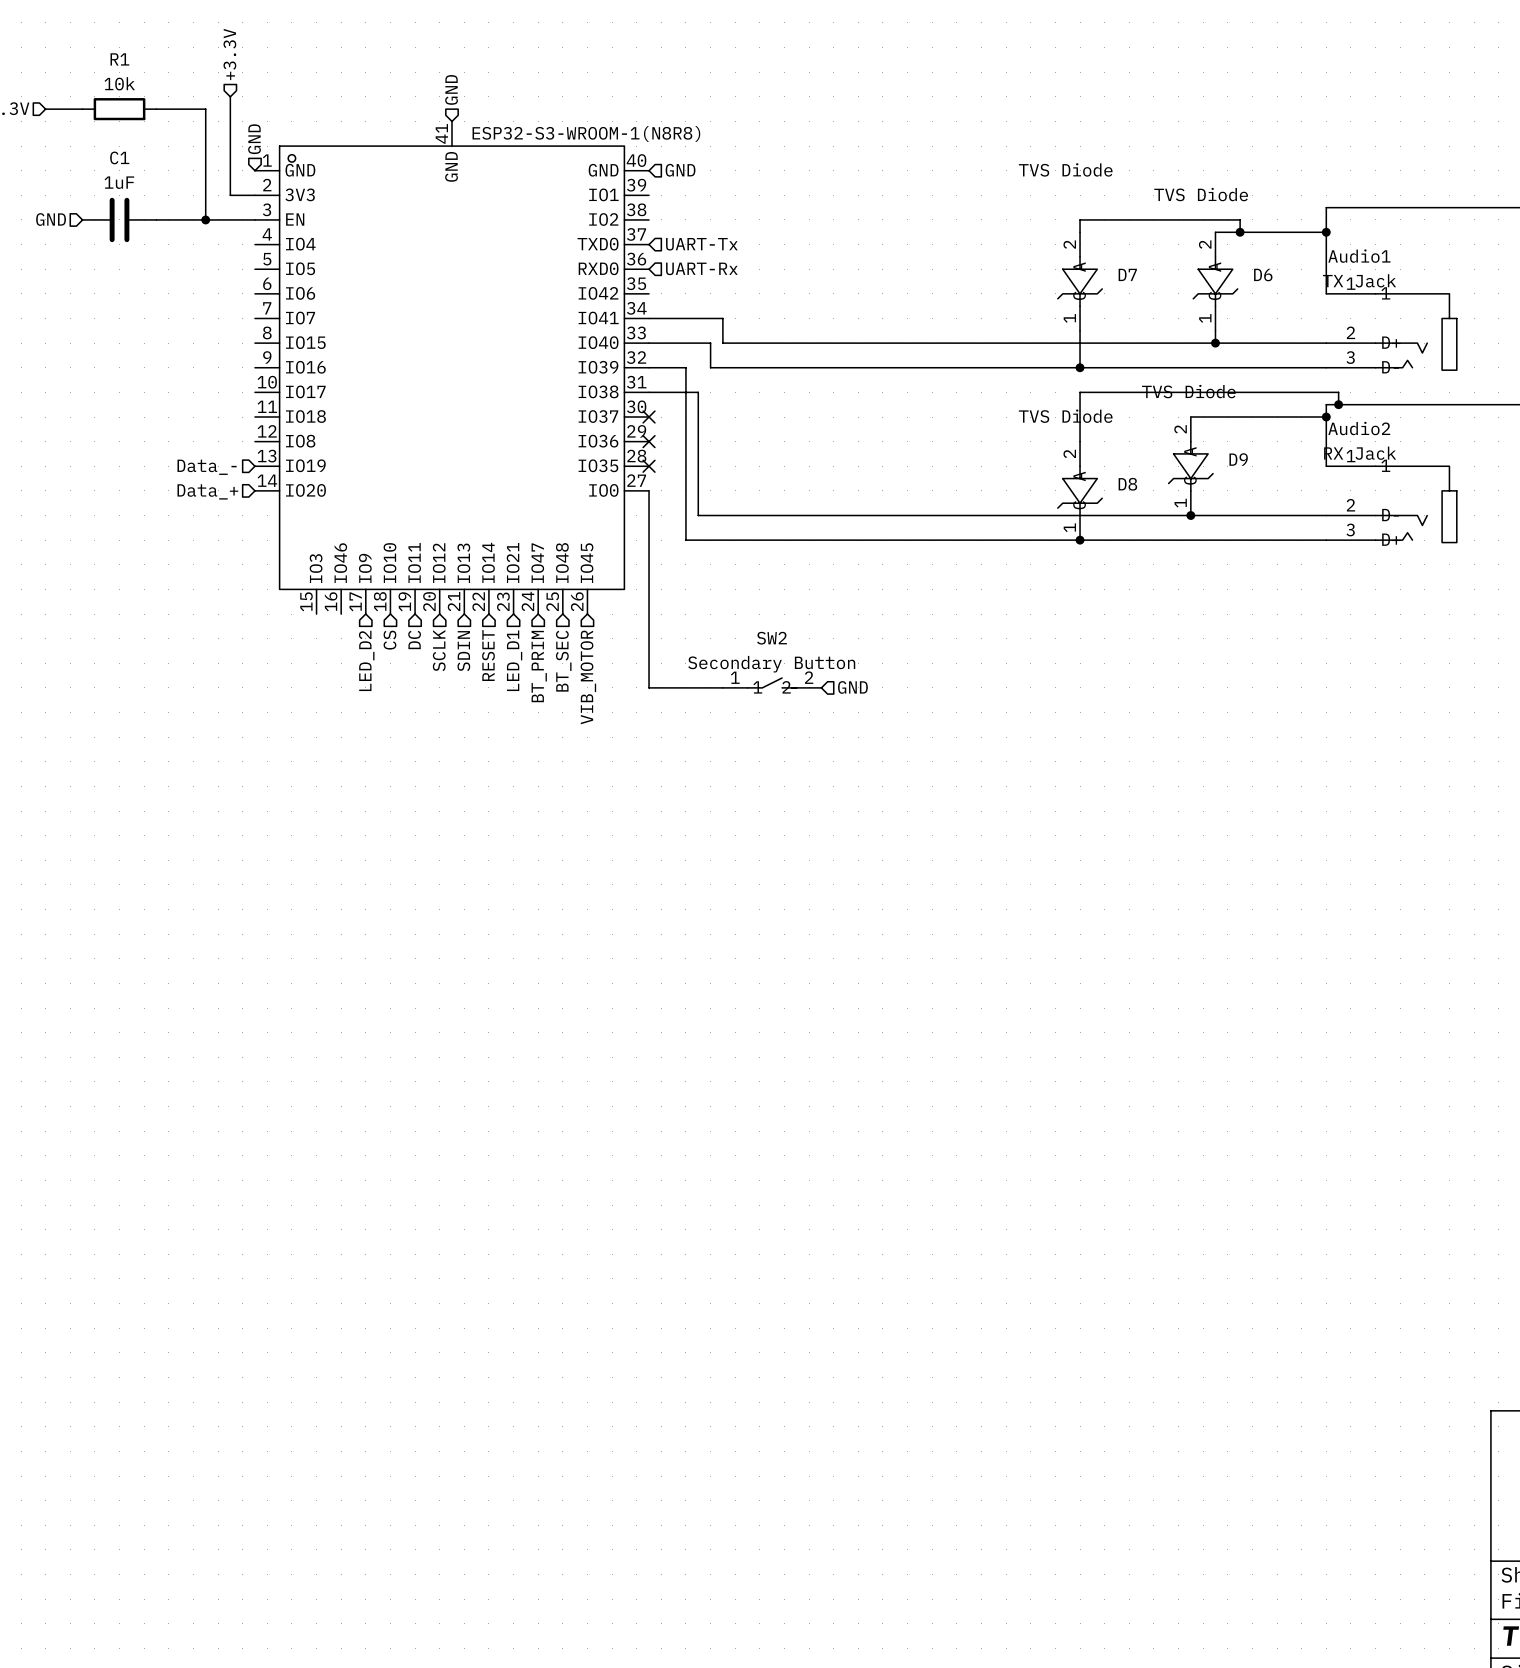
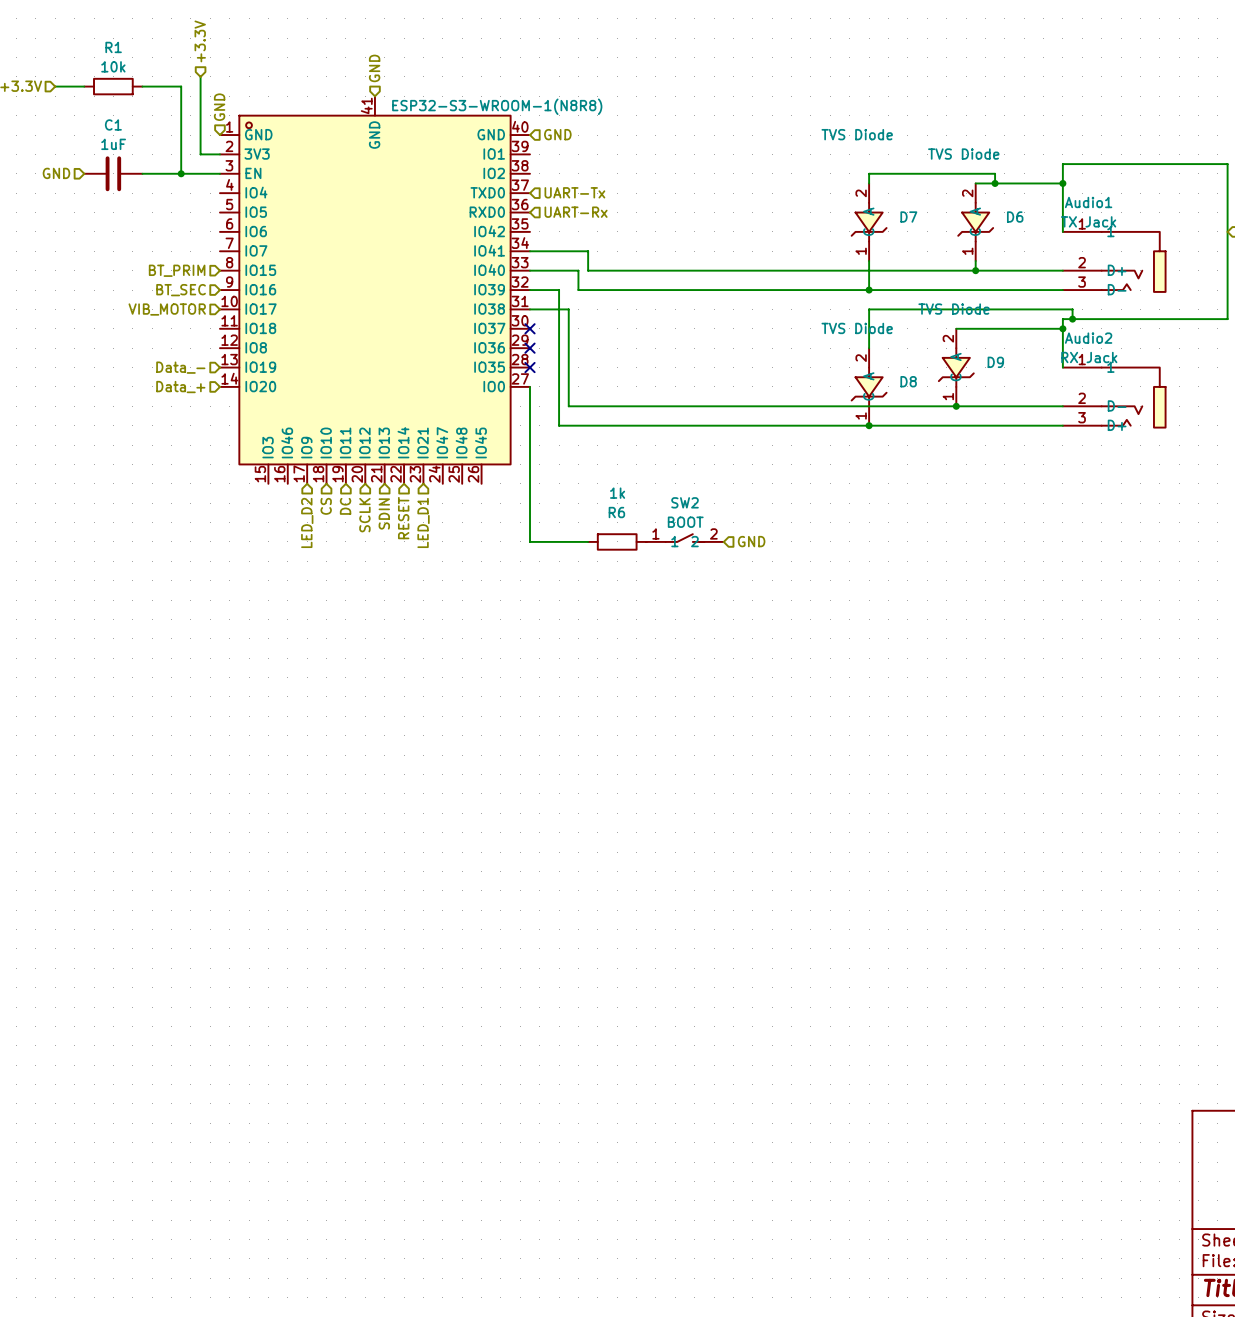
hierarchical label: none -> BT_PRIM (177, 270)
hierarchical label: none -> BT_SEC (181, 290)
hierarchical label: none -> VIB_MOTOR (167, 309)
hierarchical label: BT_SEC (563, 661) -> none
SW2 value: Secondary Button (771, 664) -> BOOT (685, 522)
hierarchical label: BT_PRIM (539, 666) -> none
hierarchical label: VIB_MOTOR (588, 677) -> none
SW2 position: (772, 682) -> (685, 538)
R6: none -> 1k (617, 541)
hierarchical label position: GND (852, 687) -> GND (751, 541)

